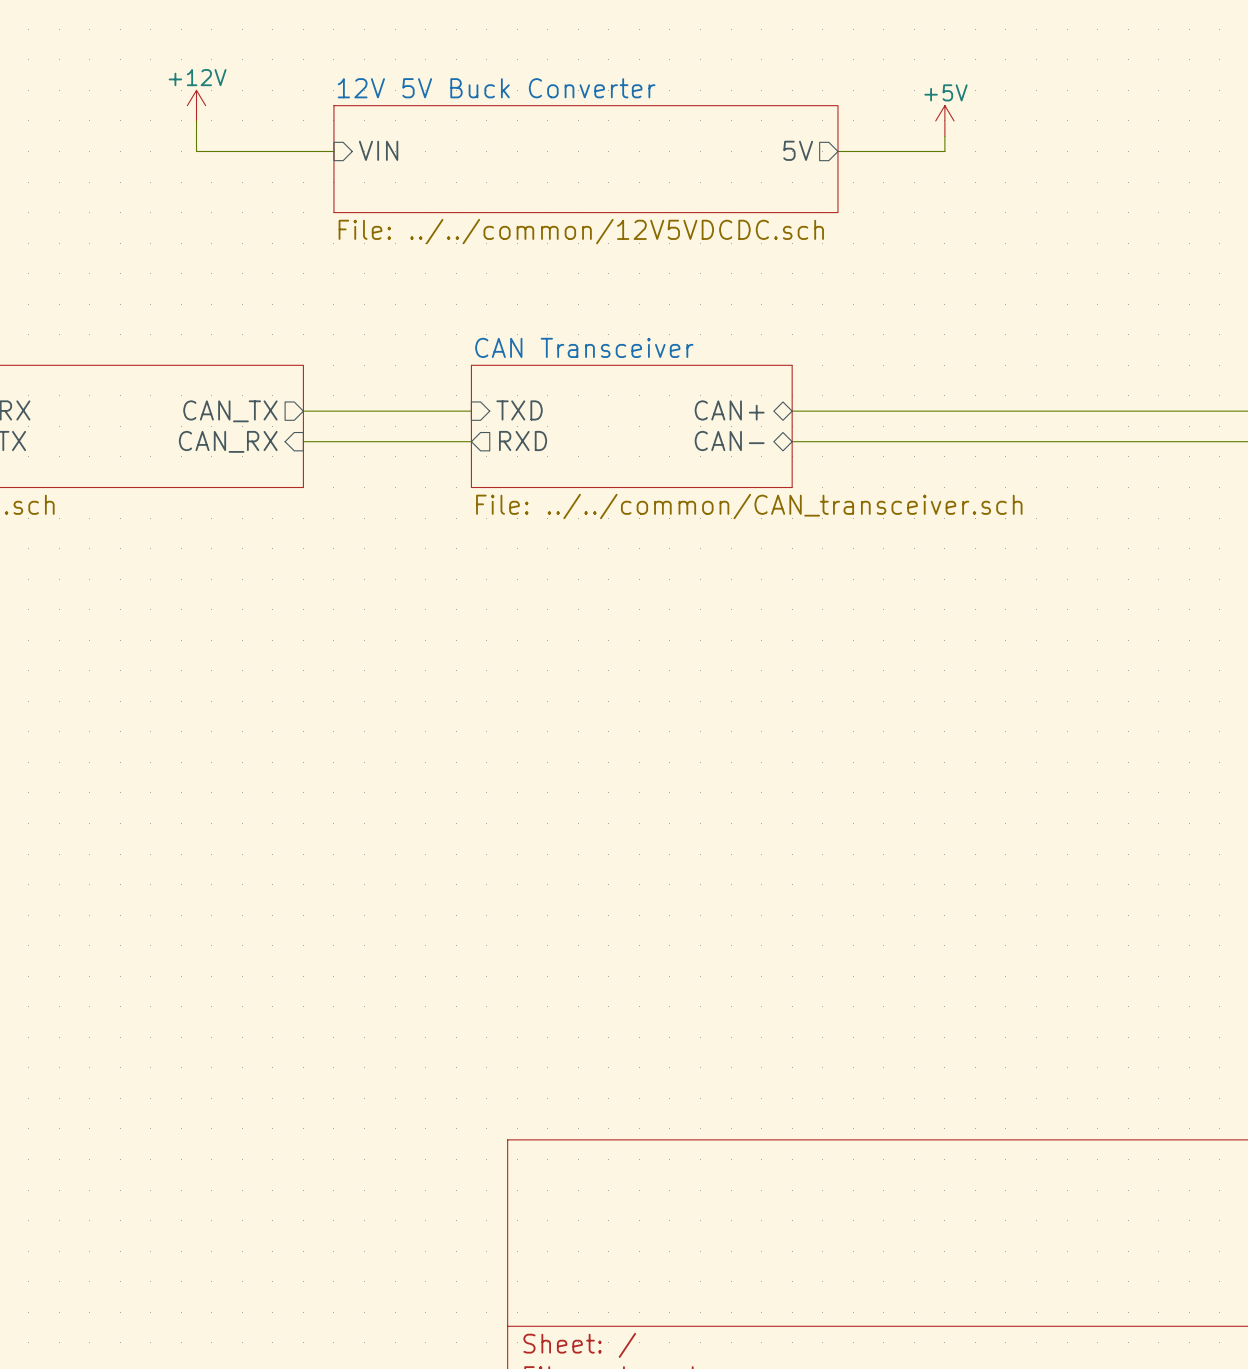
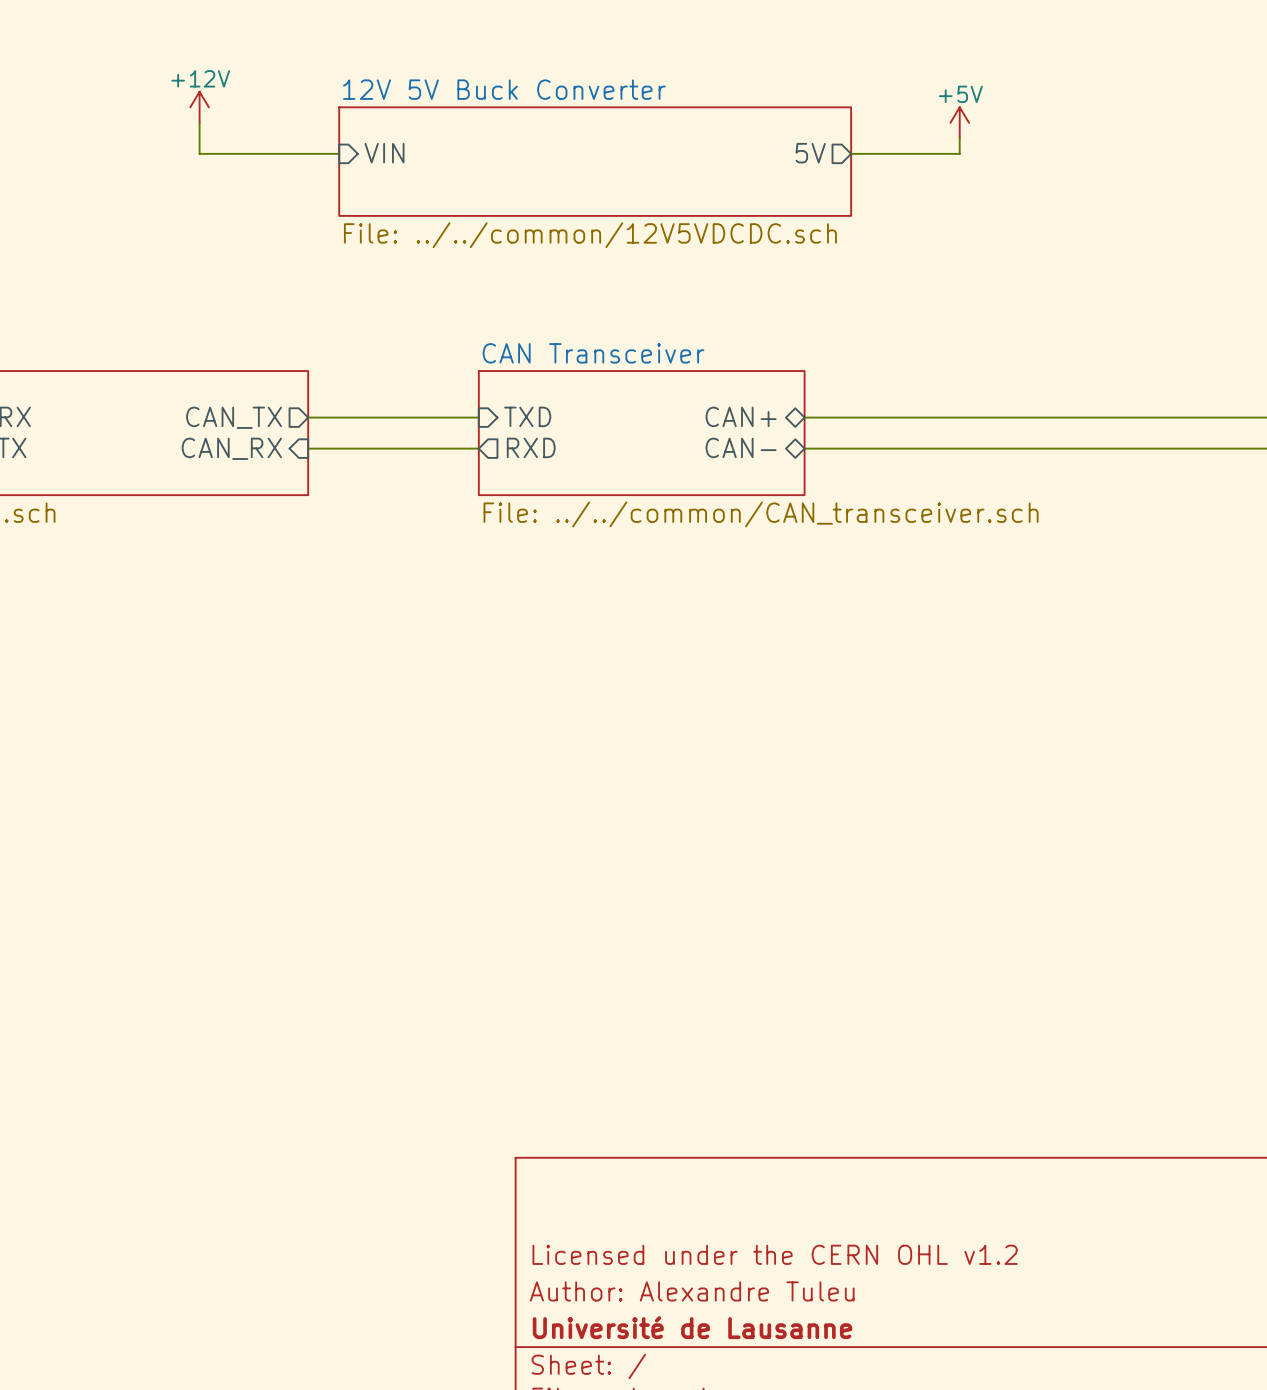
title block: none -> Licensed under the CERN OHL v1.2 (775, 1254)
title block: none -> Author: Alexandre Tuleu (692, 1291)
title block: none -> Université de Lausanne (692, 1327)

